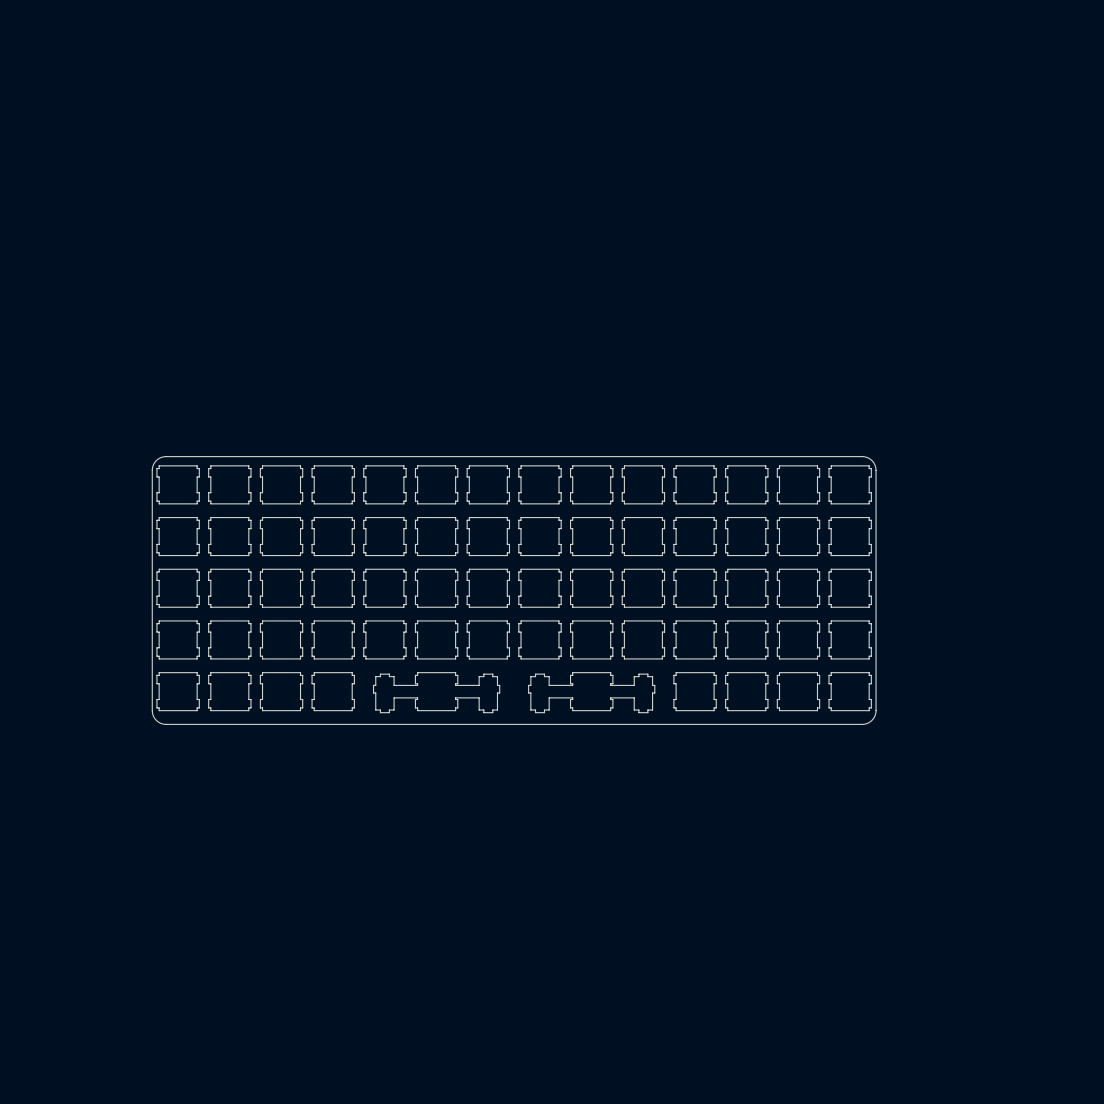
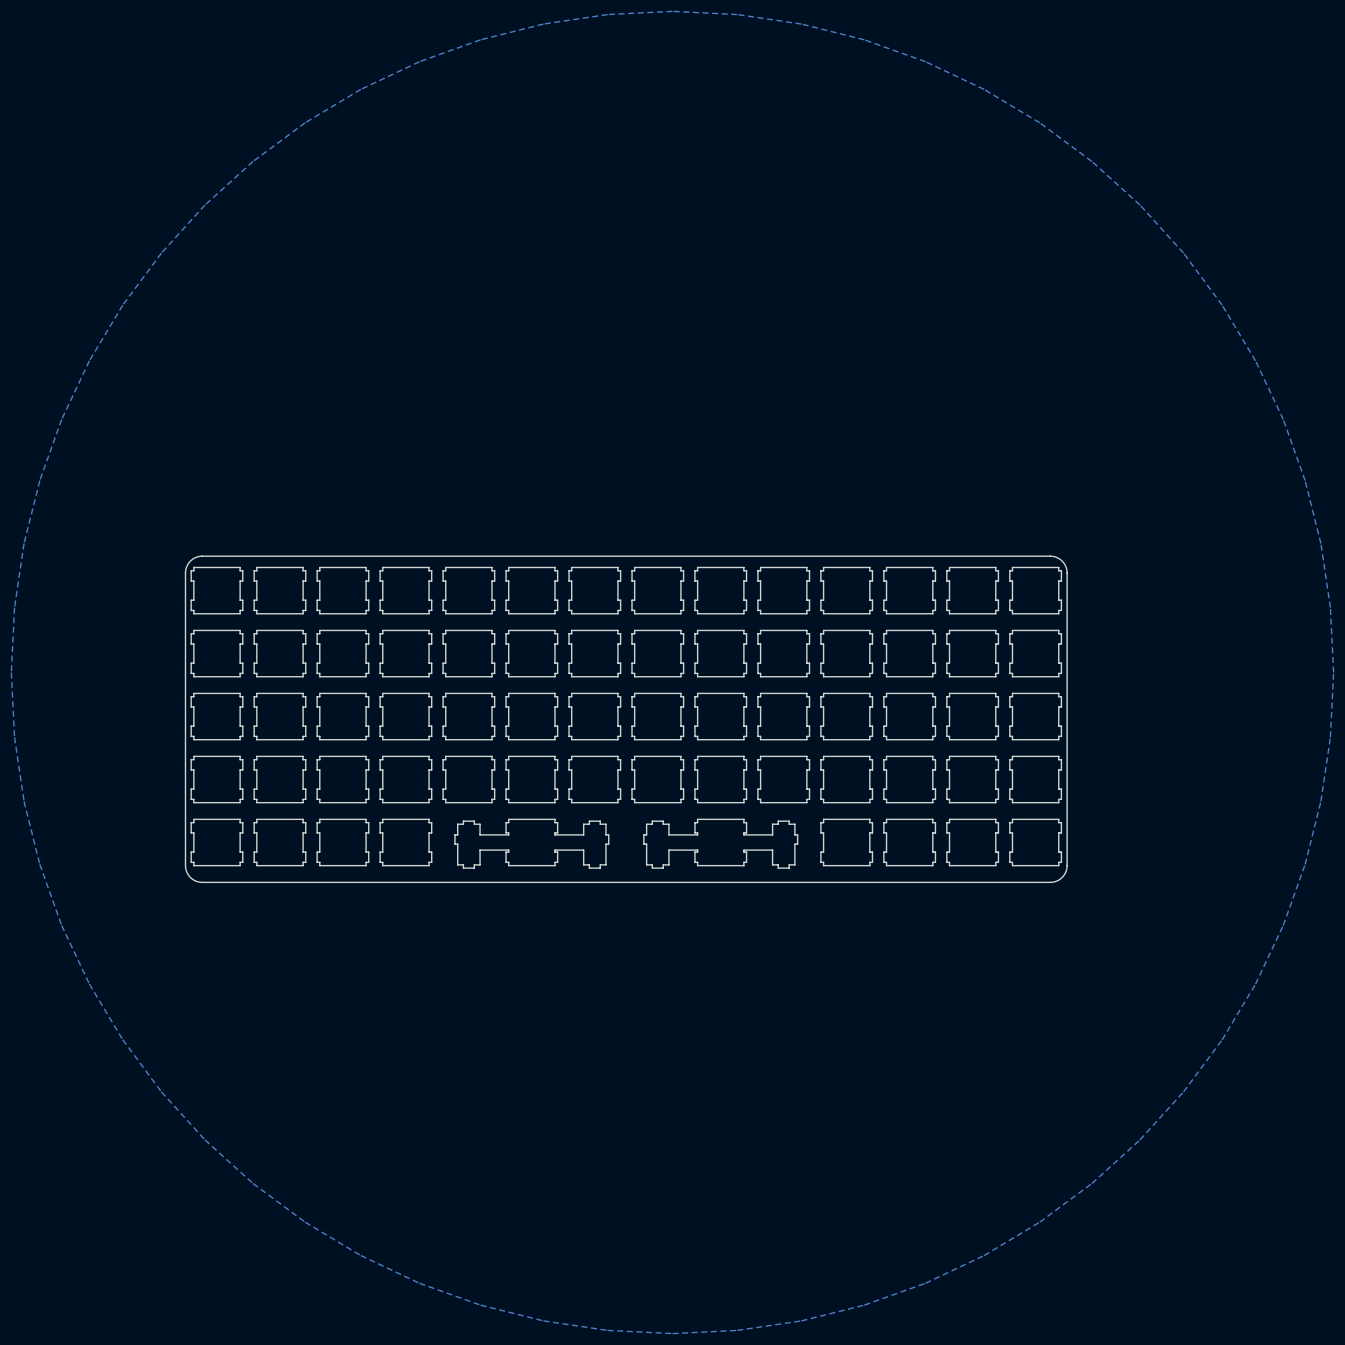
bottom zone outline: none -> (672, 11) (737, 14) (801, 24) (864, 39) (925, 61) (984, 89) (1039, 122) (1091, 161) (1139, 204) (1183, 253) (1222, 305) (1255, 360) (1283, 419) (1305, 480) (1320, 543) (1330, 607) (1333, 672) (1330, 737) (1320, 801) (1305, 864) (1283, 925) (1255, 984) (1222, 1039) (1183, 1091) (1139, 1139) (1091, 1183) (1039, 1222) (984, 1255) (925, 1283) (864, 1305) (801, 1320) (737, 1330) (672, 1333) (607, 1330) (543, 1320) (480, 1305) (419, 1283) (360, 1255) (305, 1222) (253, 1183) (204, 1139) (161, 1091) (122, 1039) (89, 984) (61, 925) (39, 864) (24, 801) (14, 737) (11, 672) (14, 607) (24, 543) (39, 480) (61, 419) (89, 360) (122, 305) (161, 253) (204, 204) (253, 161) (305, 122) (360, 89) (419, 61) (480, 39) (543, 24) (607, 14) (672, 11)

